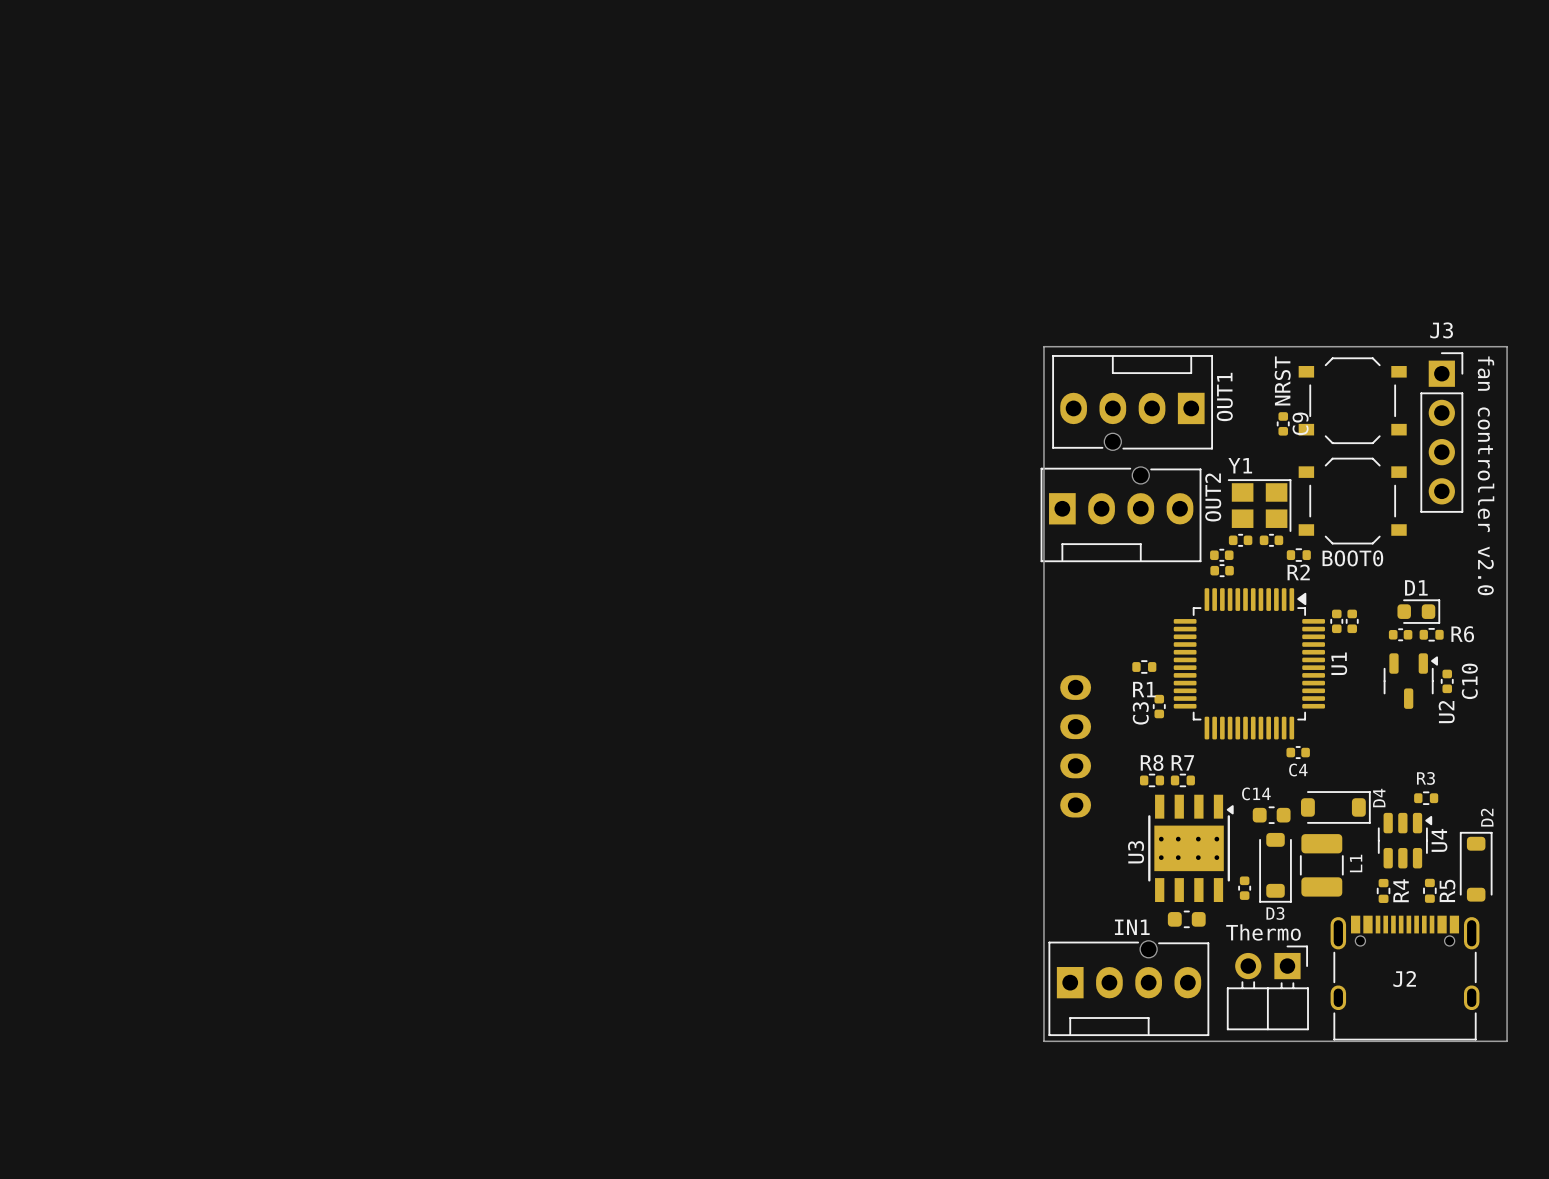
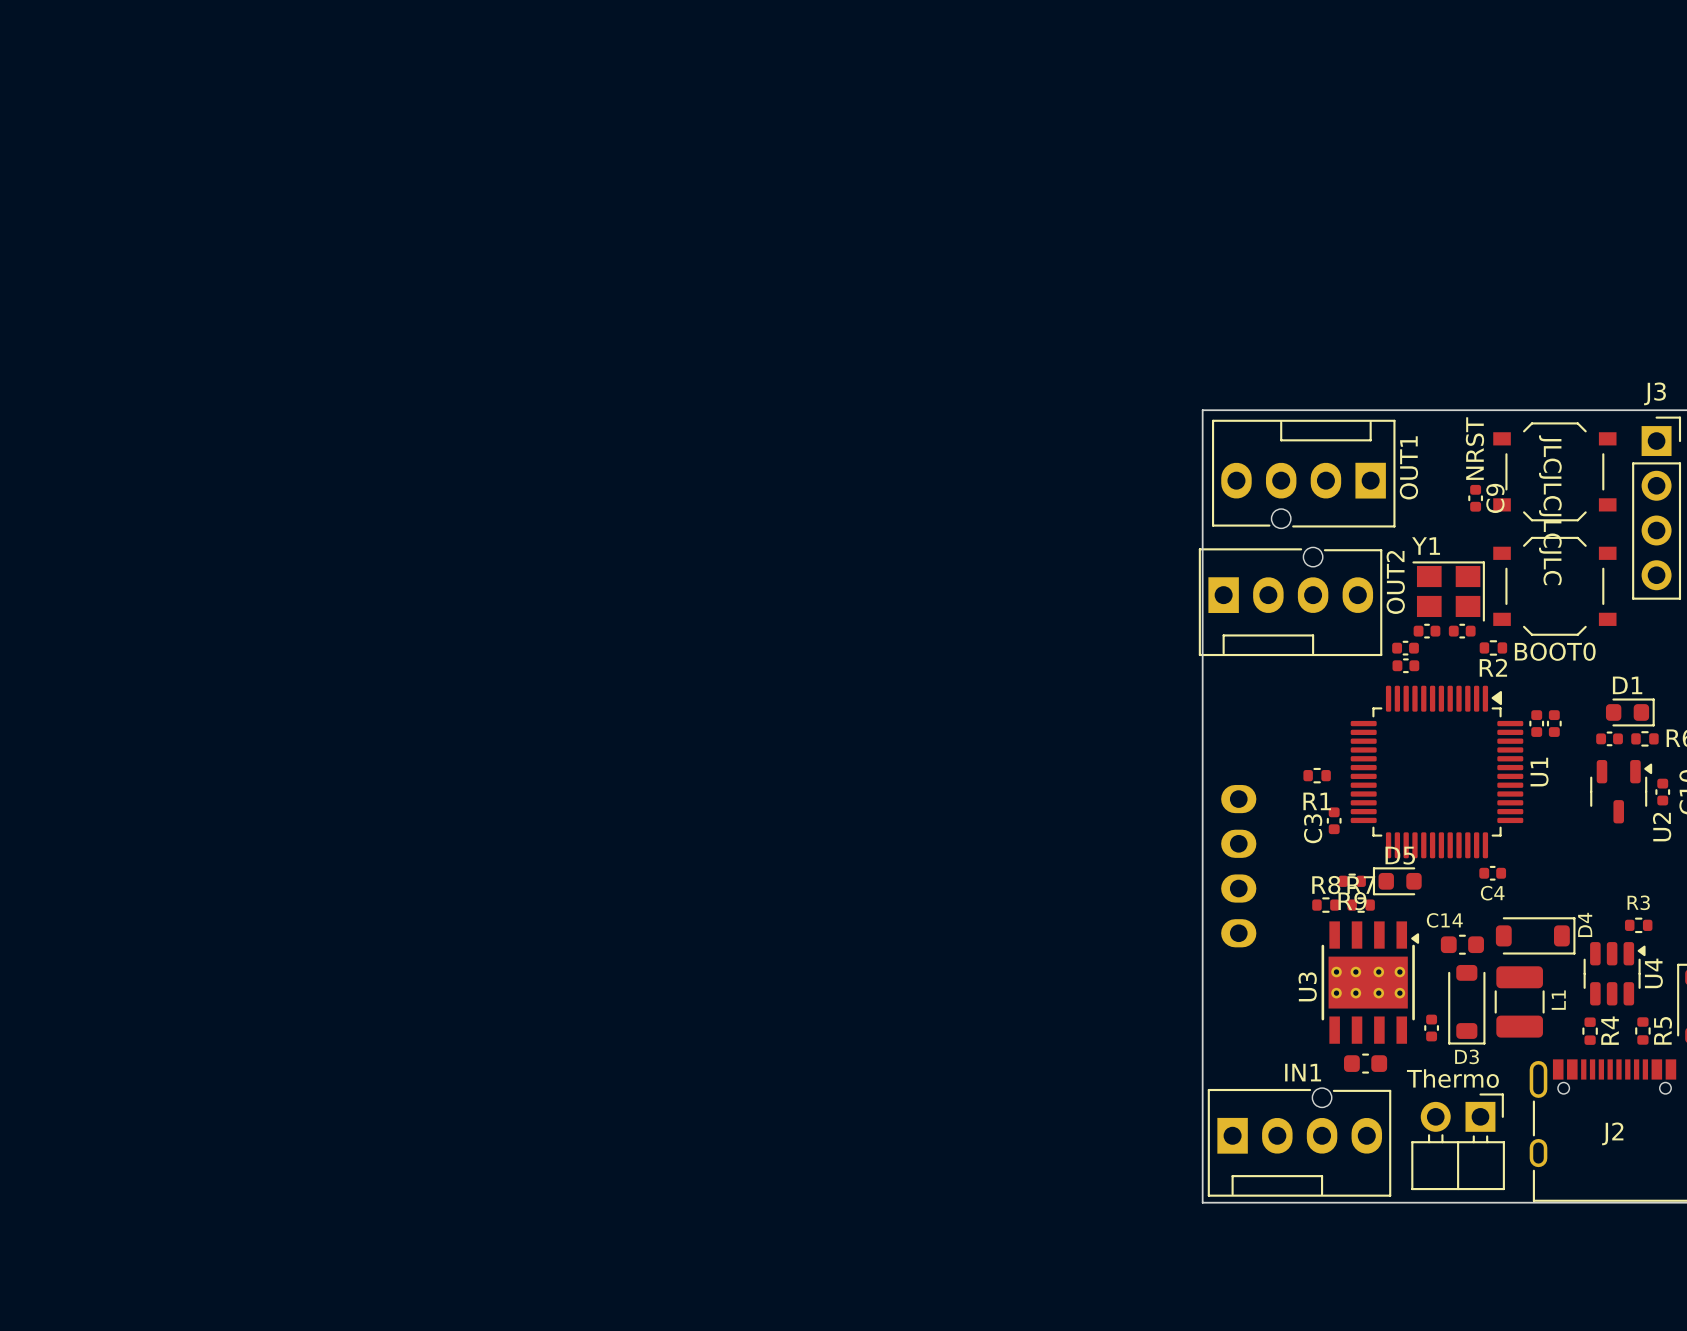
text: none -> JLCJLCJLCJLC (1550, 510)
R9: none -> (1352, 881)
D5: none -> (1397, 881)

